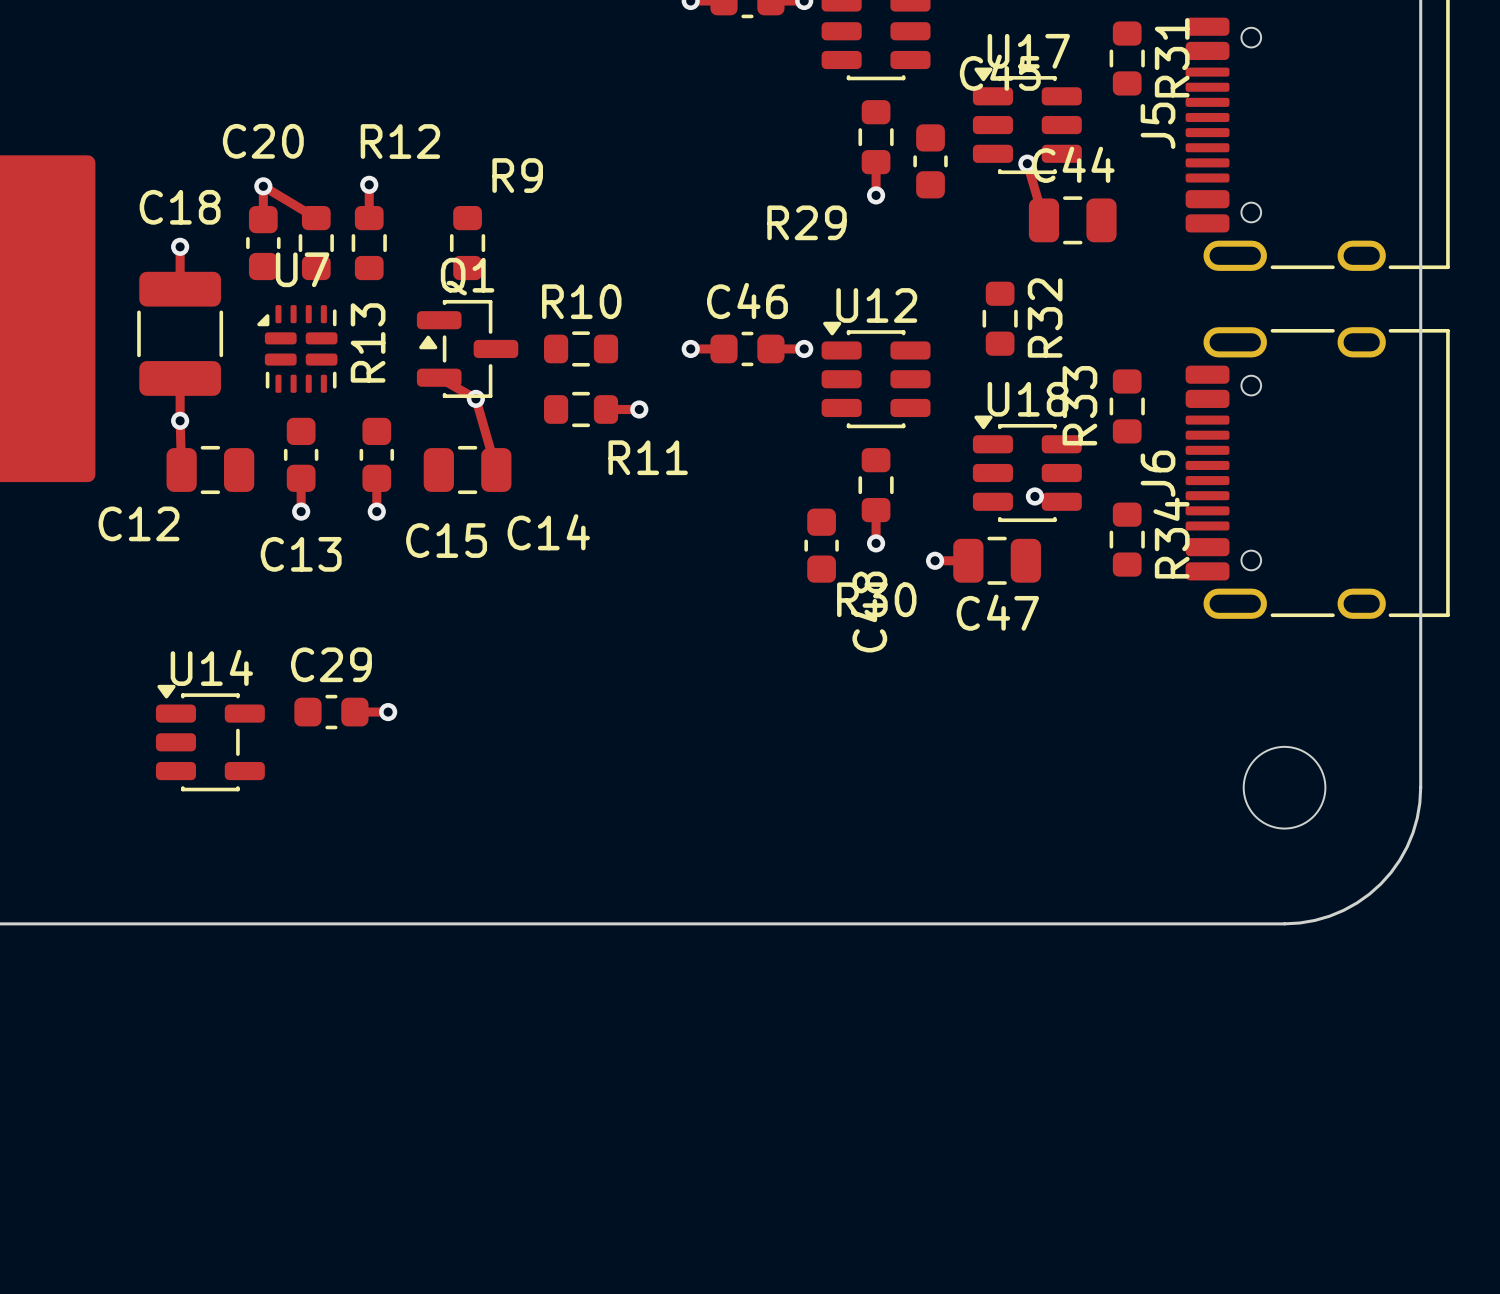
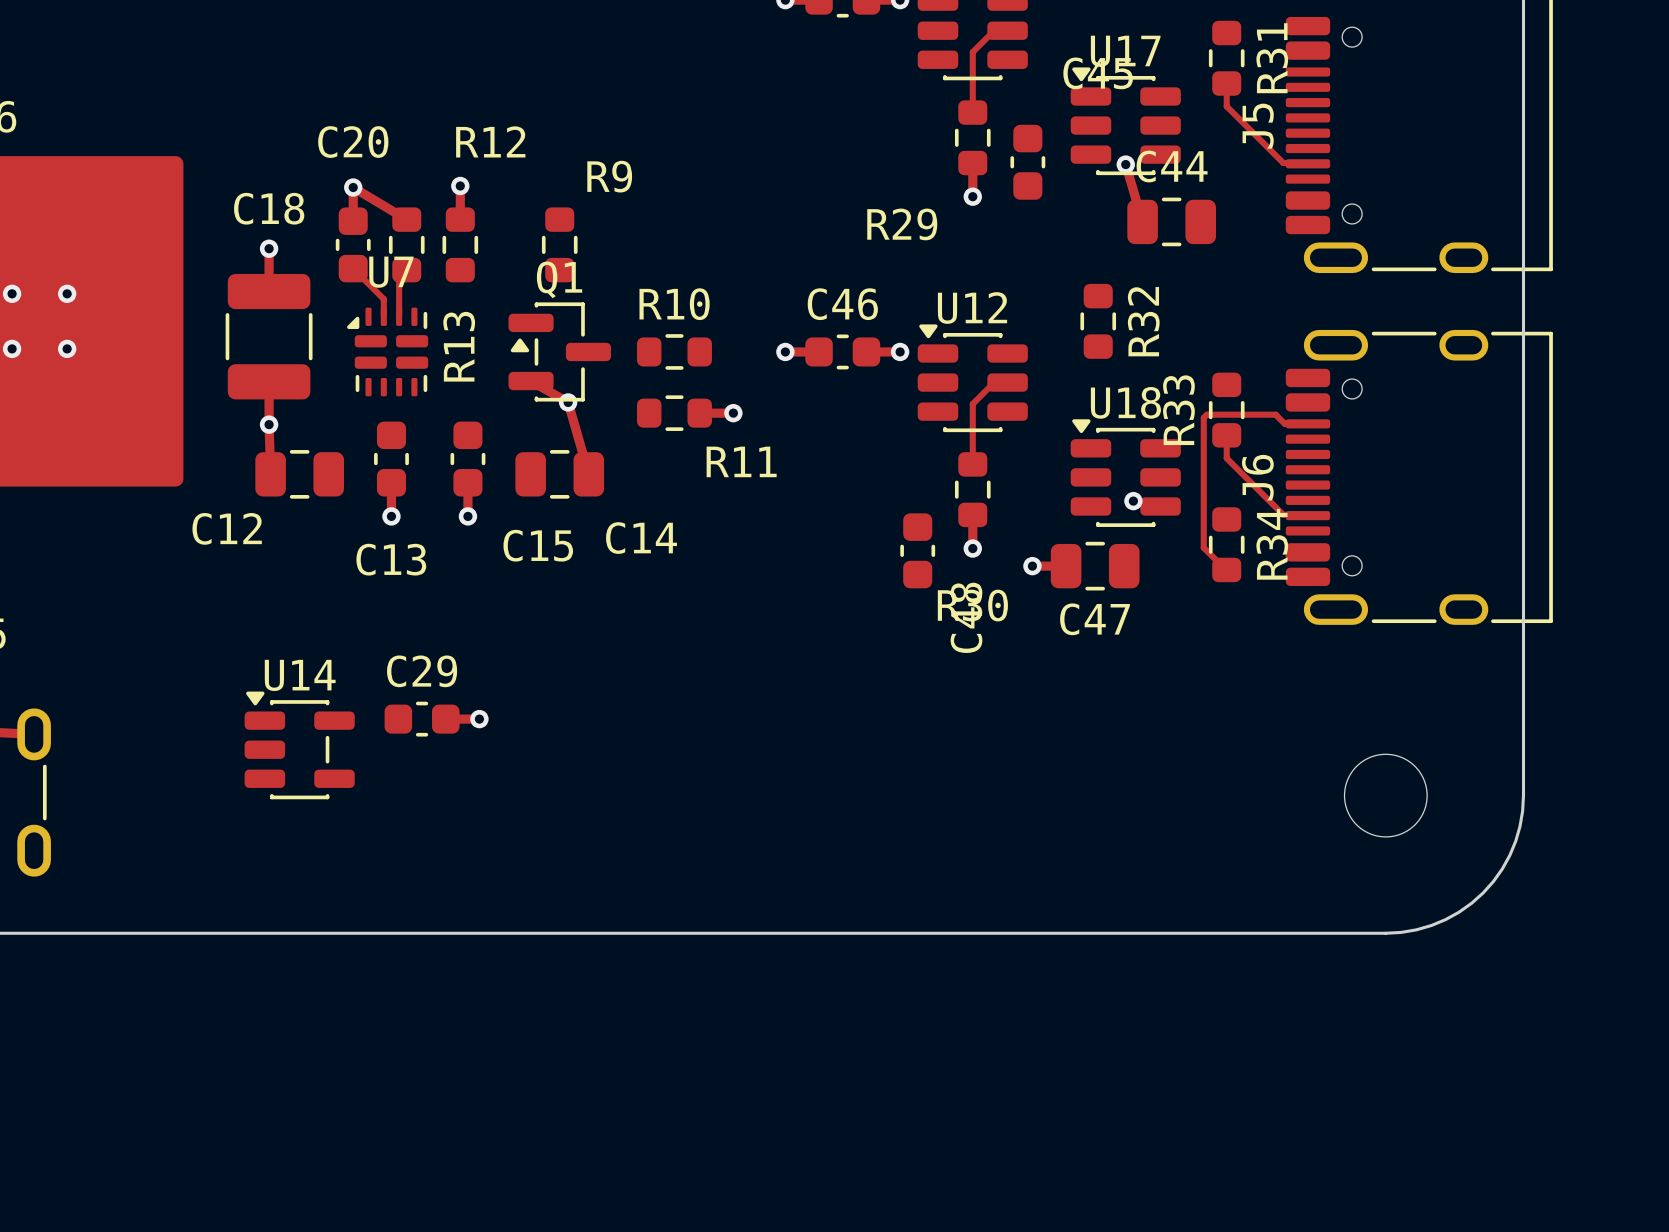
top track: none -> (1007, 30) (994, 30) (972, 52) (972, 111)
top track: none -> (1226, 83) (1226, 106) (1283, 163) (1307, 163)
top track: none -> (353, 268) (383, 299) (383, 316)
top track: none -> (406, 270) (399, 277) (399, 316)
top track: none -> (1007, 382) (994, 382) (972, 403) (972, 463)
top track: none -> (1307, 423) (1284, 423) (1275, 414) (1206, 414) (1203, 417) (1203, 547) (1226, 570)
top track: none -> (1226, 435) (1226, 458) (1283, 514) (1307, 514)

